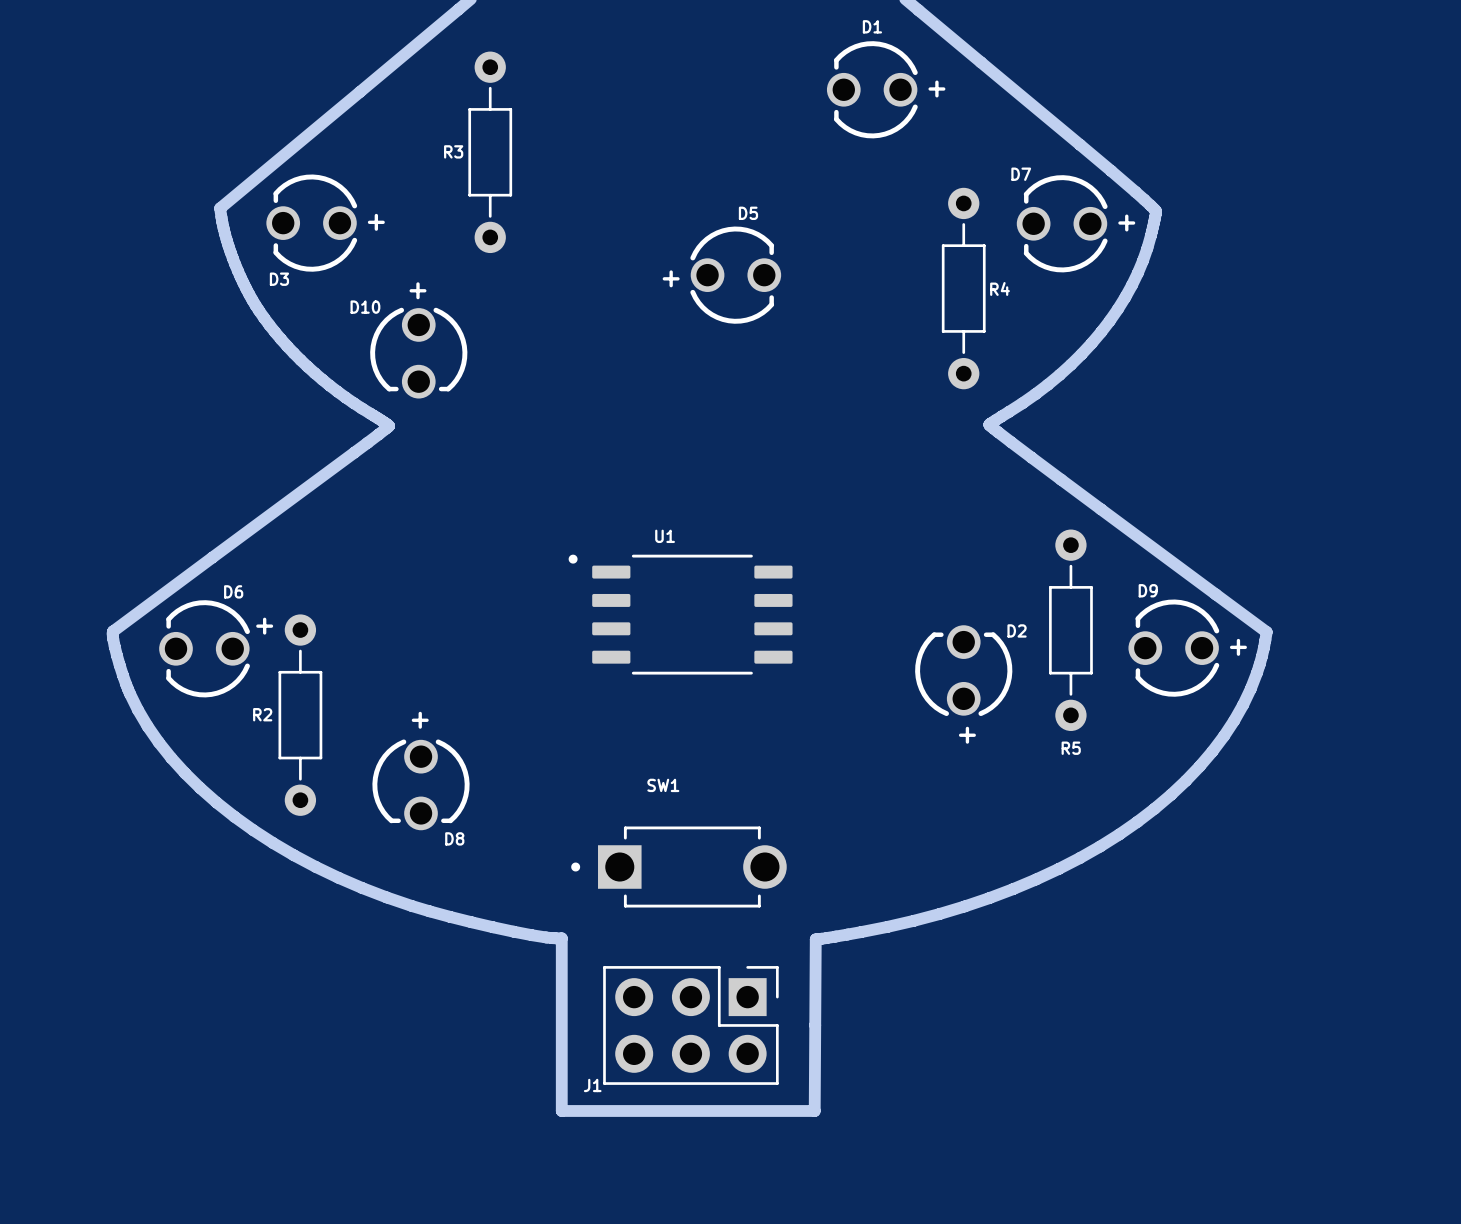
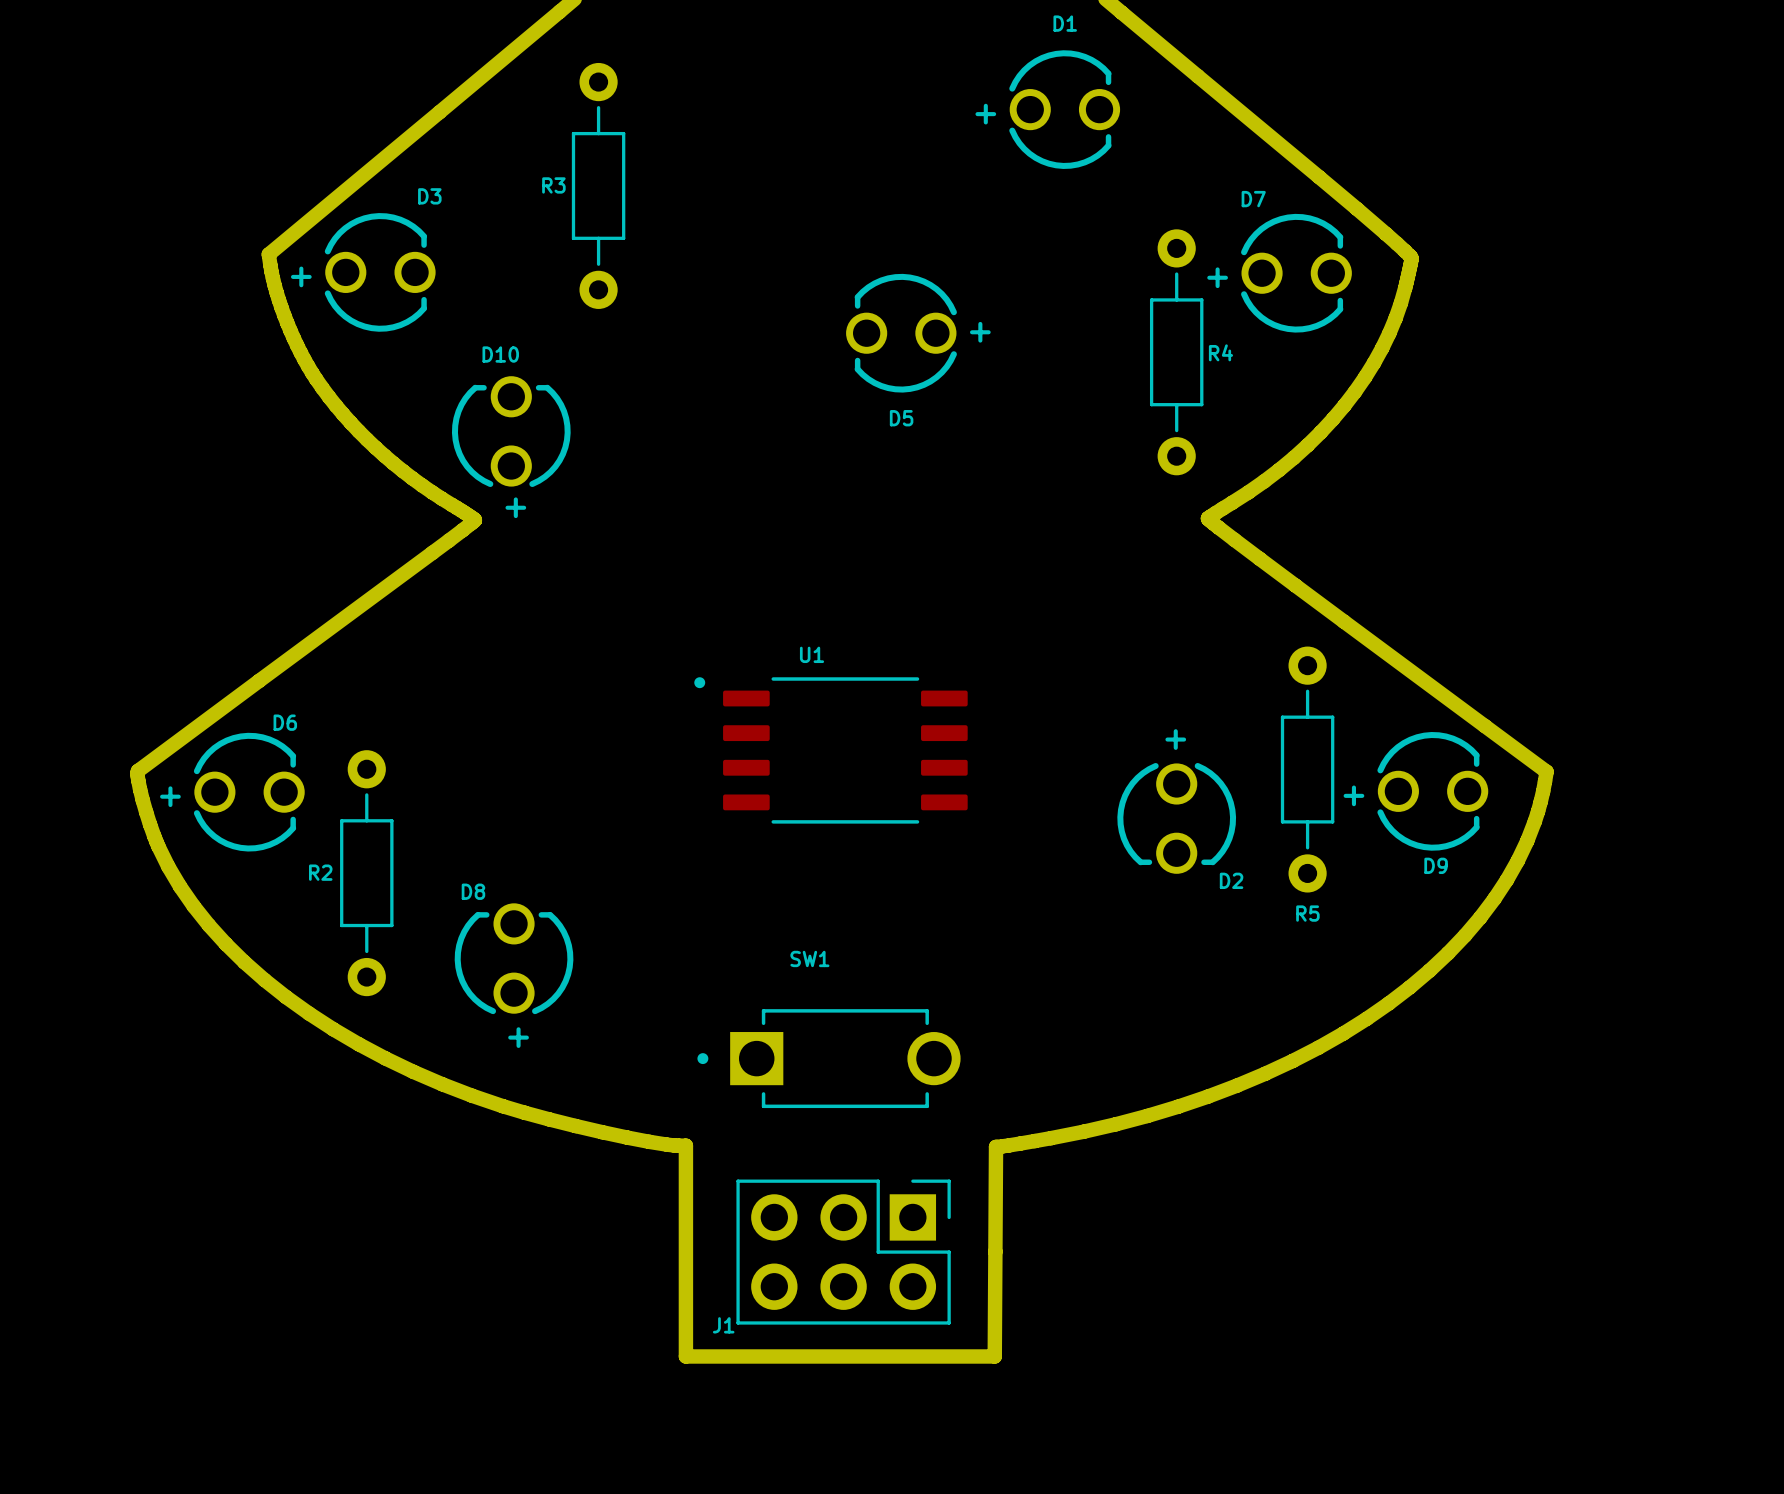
D1 rotation: 0° (872, 89) -> 180° (1064, 109)
D3 rotation: 0° (311, 223) -> 180° (380, 272)
D7 rotation: 0° (1062, 223) -> 180° (1296, 273)
D5 rotation: 0° (735, 275) -> 180° (901, 333)
D10 name position: D10 (365, 307) -> D10 (500, 354)
D10 rotation: 0° (418, 353) -> 180° (511, 431)
D6 footprint: [159, 600, 250, 698] -> [193, 732, 305, 852]
D2 name position: D2 (1017, 630) -> D2 (1231, 880)
D9 rotation: 0° (1173, 648) -> 180° (1432, 791)
D2 rotation: 0° (963, 670) -> 180° (1176, 818)
D8 rotation: 0° (421, 784) -> 180° (514, 958)

